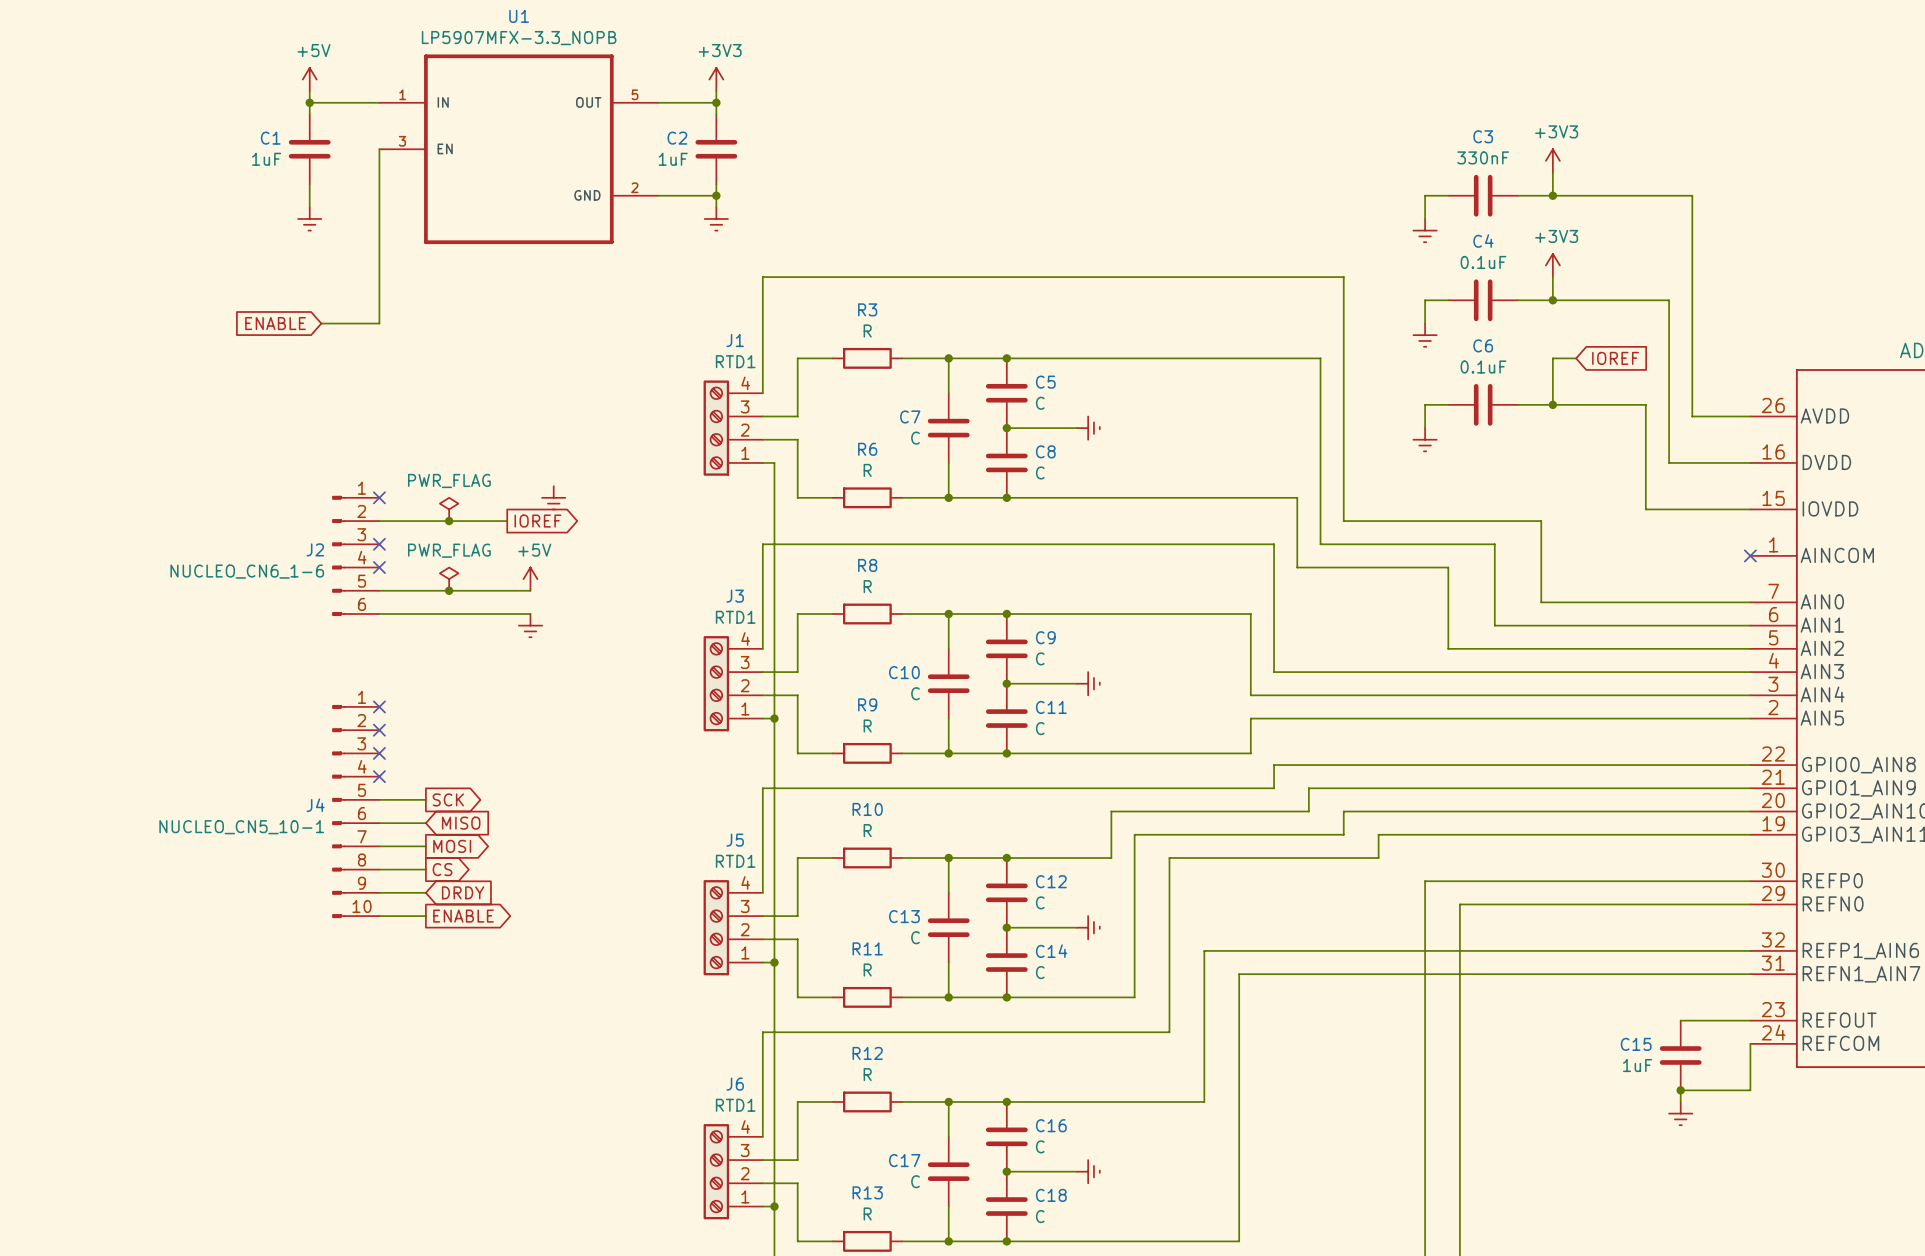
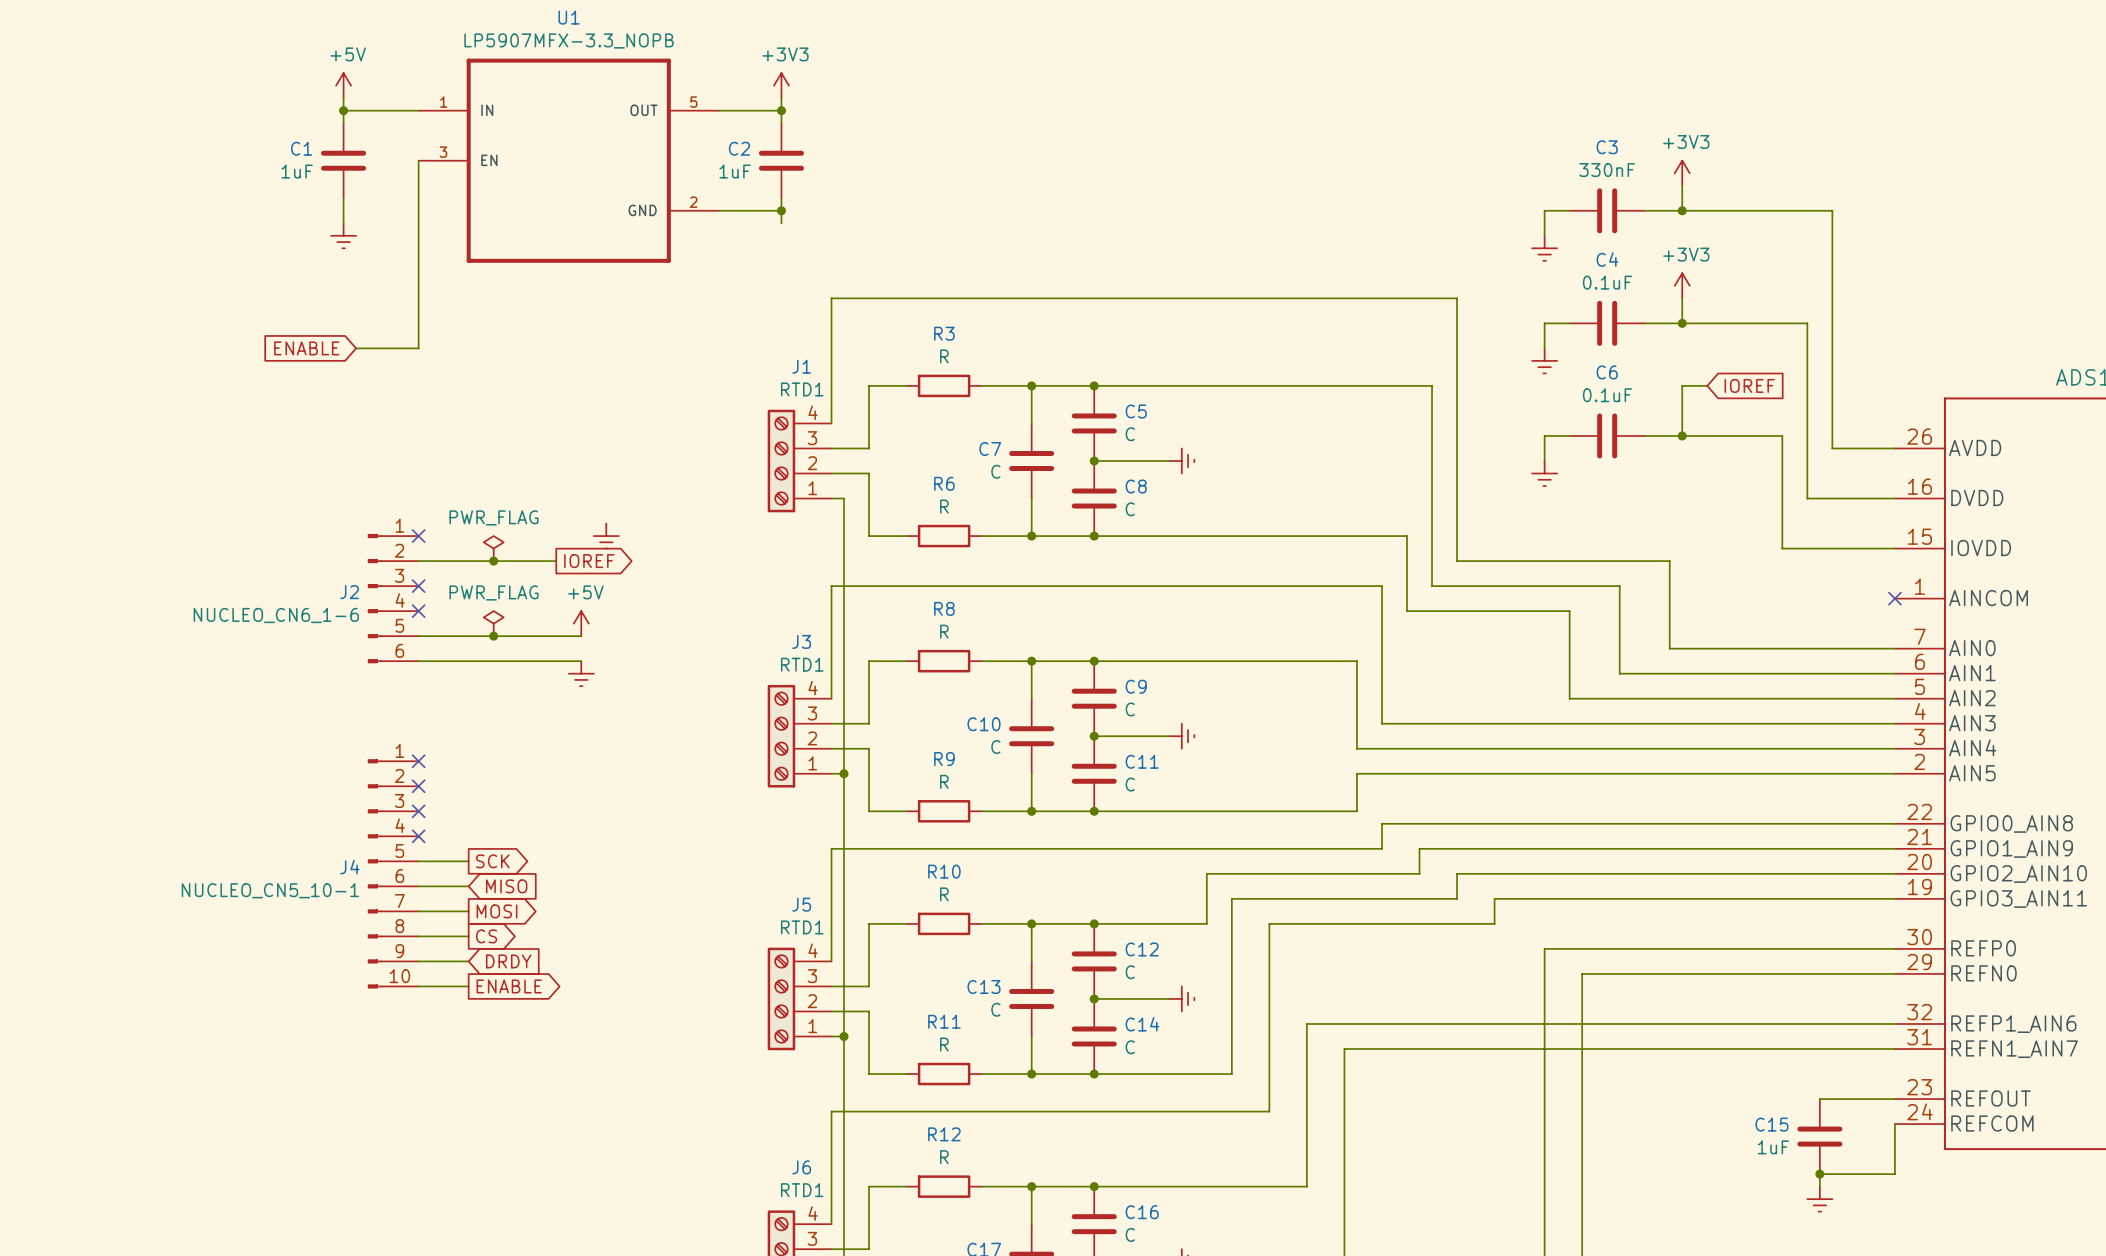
power symbol: (716, 218) -> none

